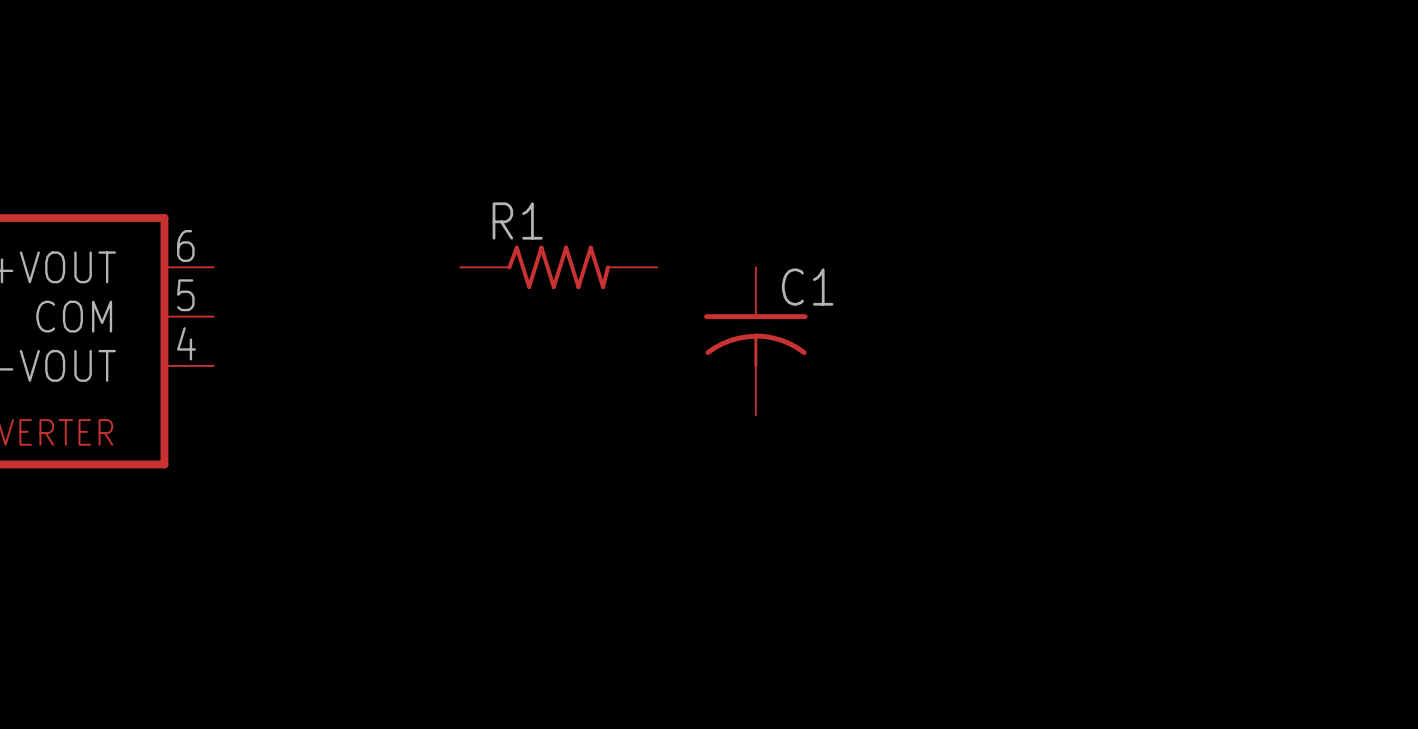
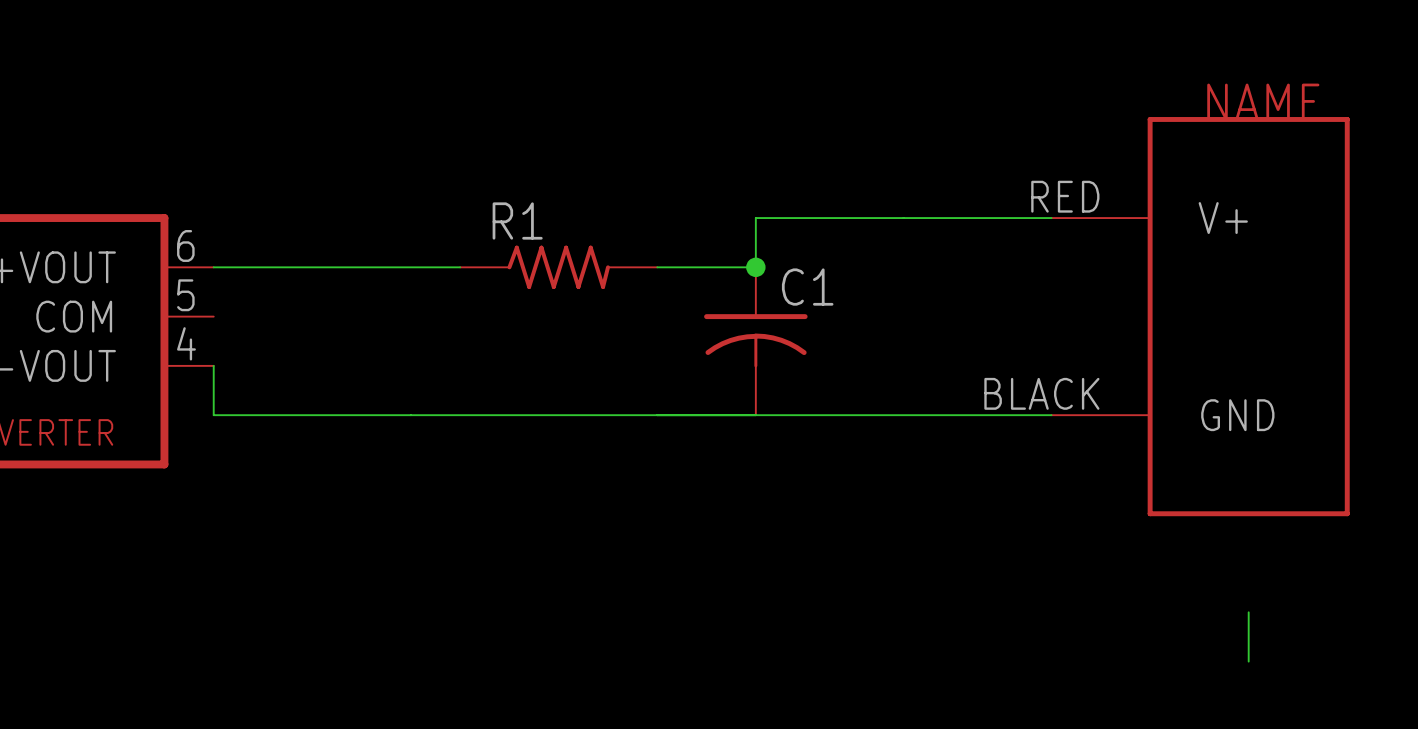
wire: none -> (1051, 218) (755, 218) (755, 267) (657, 267)
wire: none -> (213, 267) (460, 267)
junction: none -> (755, 267)
part: none -> (1200, 316)
wire: none -> (213, 365) (213, 415) (1051, 415)
wire: none -> (1248, 612) (1248, 661)

